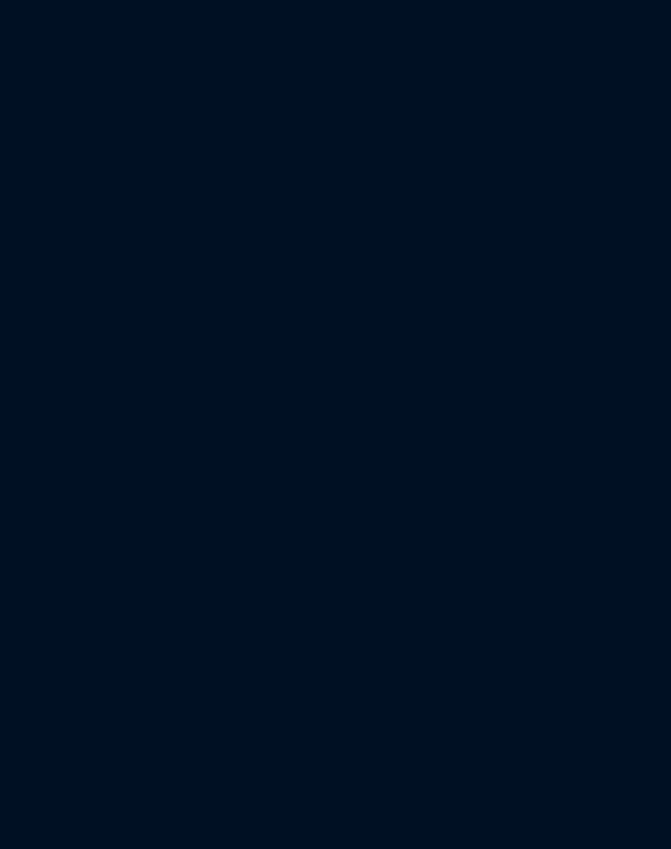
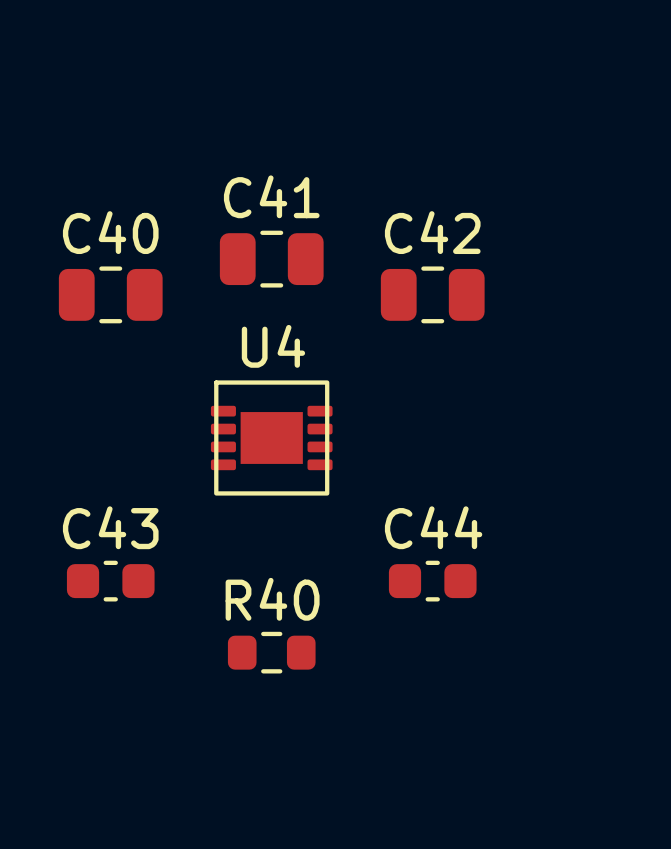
C41: none -> (271, 259)
C40: none -> (110, 294)
C42: none -> (432, 294)
U4: none -> (271, 437)
C43: none -> (110, 581)
C44: none -> (432, 581)
R40: none -> (271, 652)

